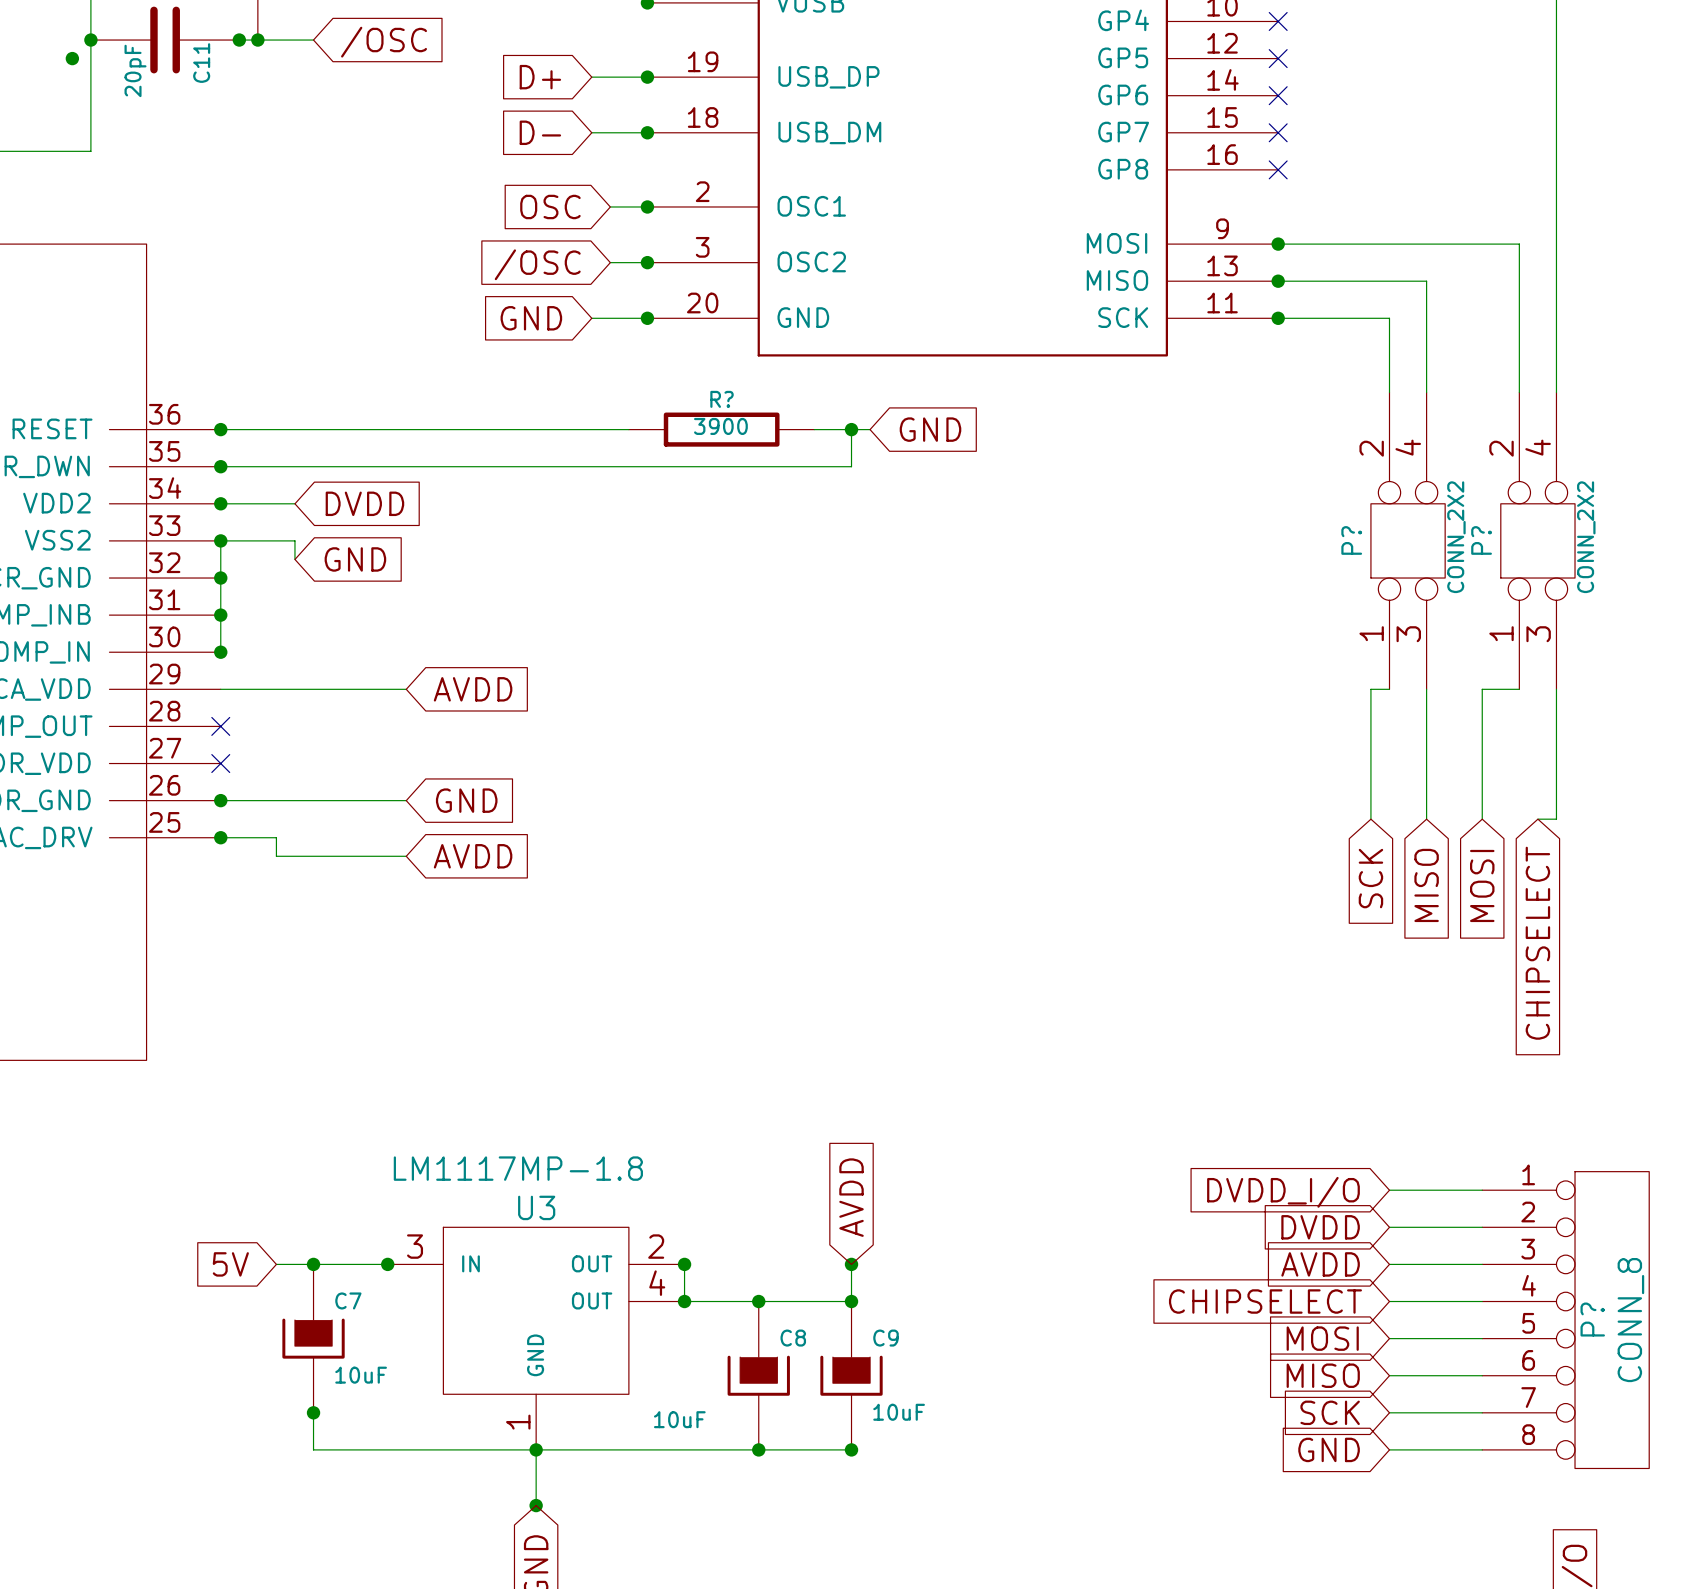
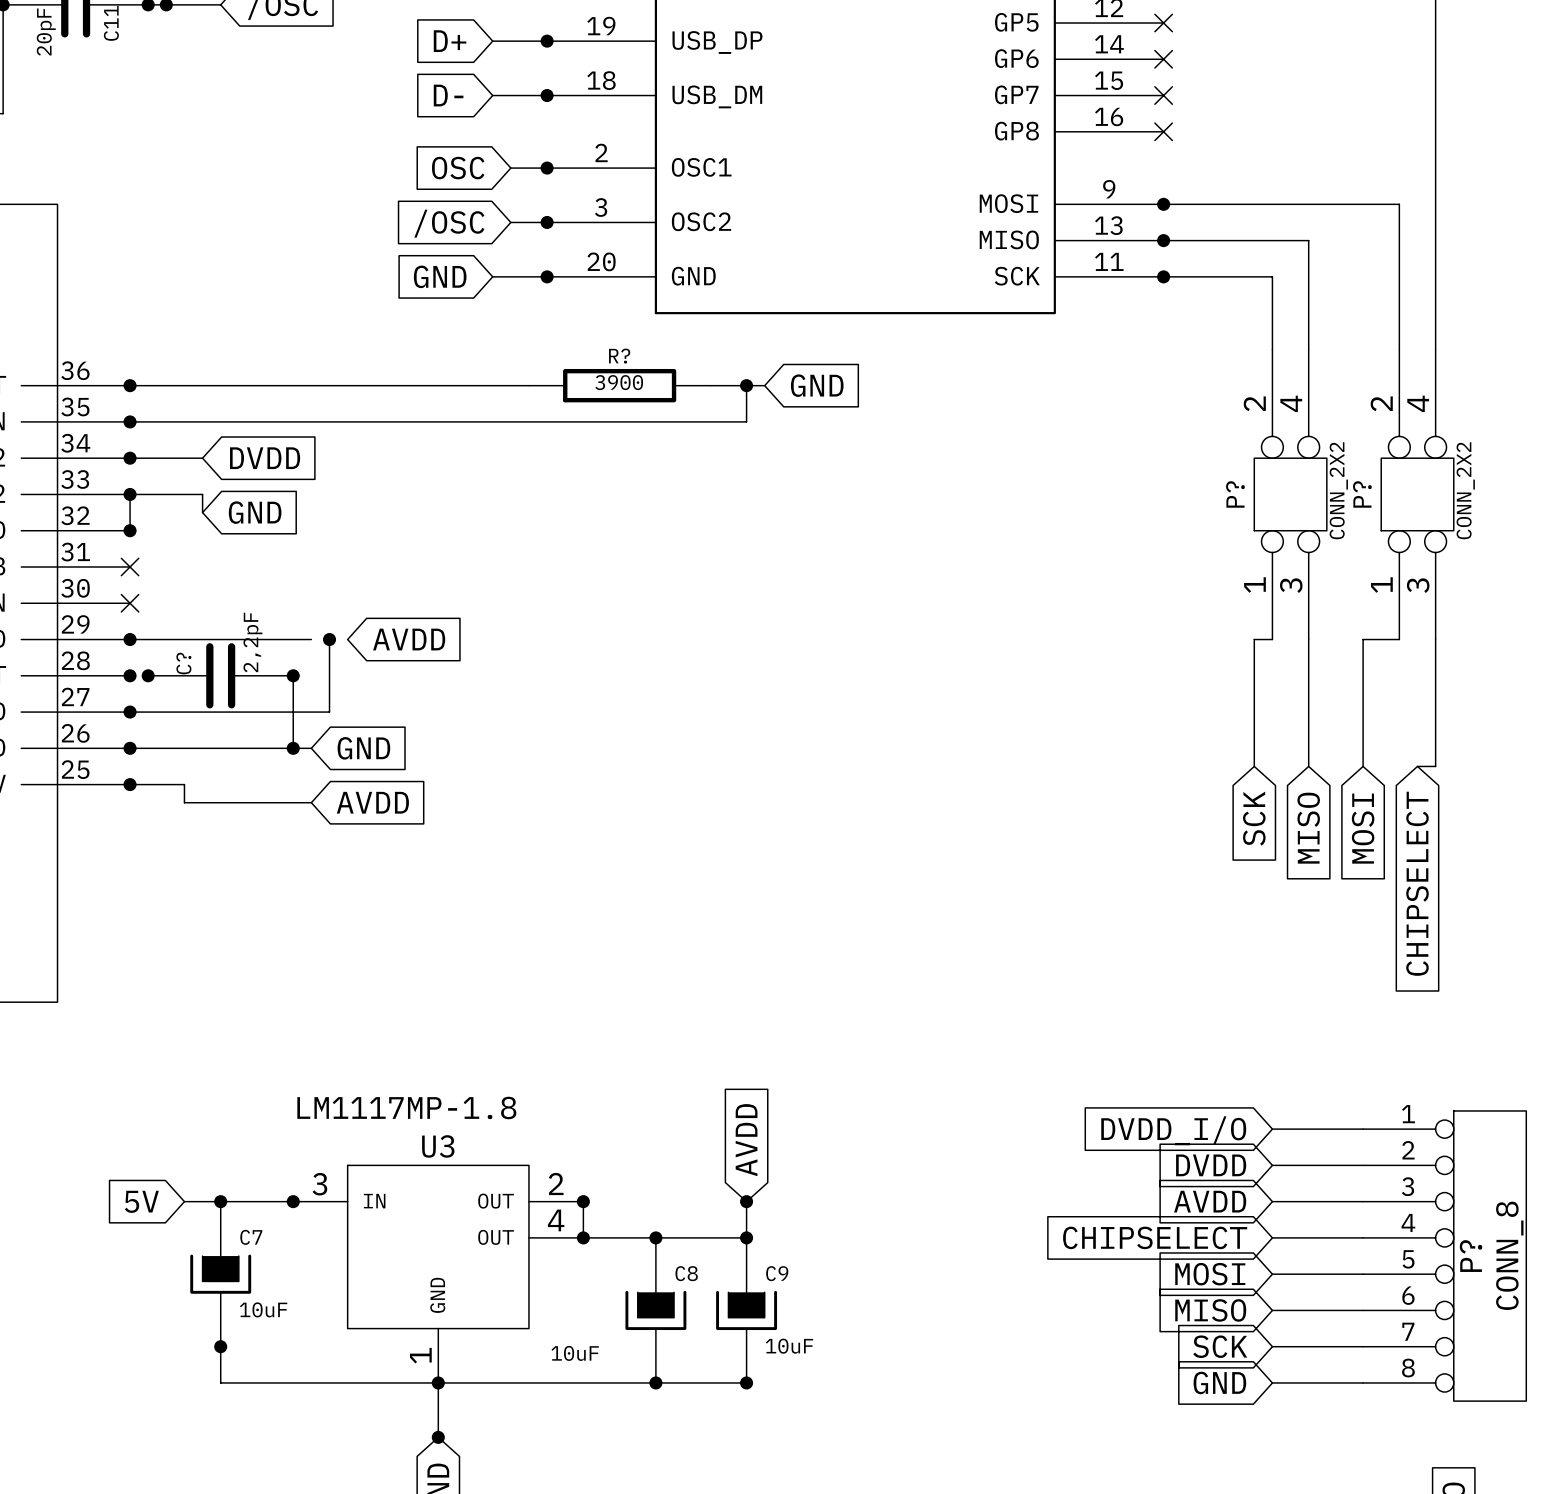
wire: (220, 578) (220, 652) -> (293, 675) (293, 748)
no-connect mark: none -> (130, 566)
junction: (220, 615) -> none
no-connect mark: none -> (130, 603)
junction: (220, 652) -> none
junction: none -> (130, 639)
wire: none -> (329, 639) (329, 712) (130, 712)
junction: none -> (329, 639)
global label position: AVDD (473, 689) -> AVDD (409, 639)
no-connect mark: (220, 726) -> none
junction: none -> (130, 675)
junction: none -> (148, 675)
C?: none -> 2,2pF (220, 675)
junction: none -> (293, 675)
no-connect mark: (220, 763) -> none
junction: none -> (130, 712)
junction: none -> (293, 748)

